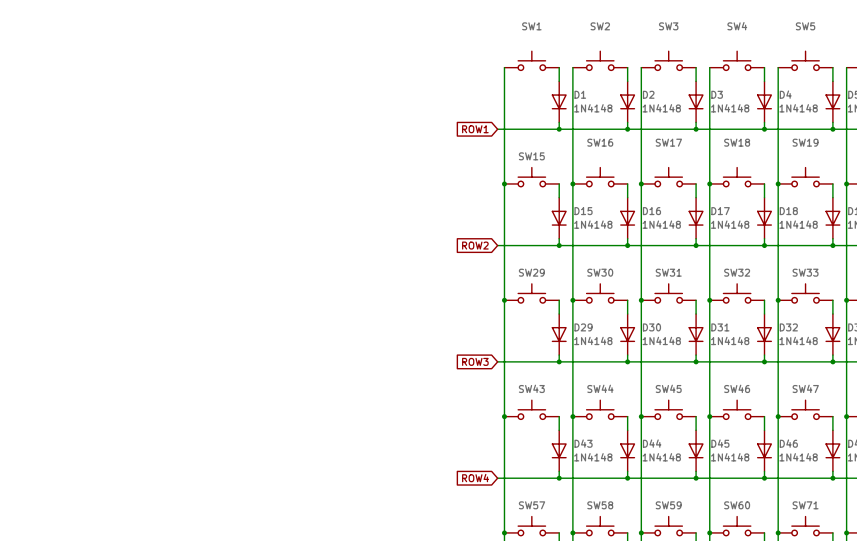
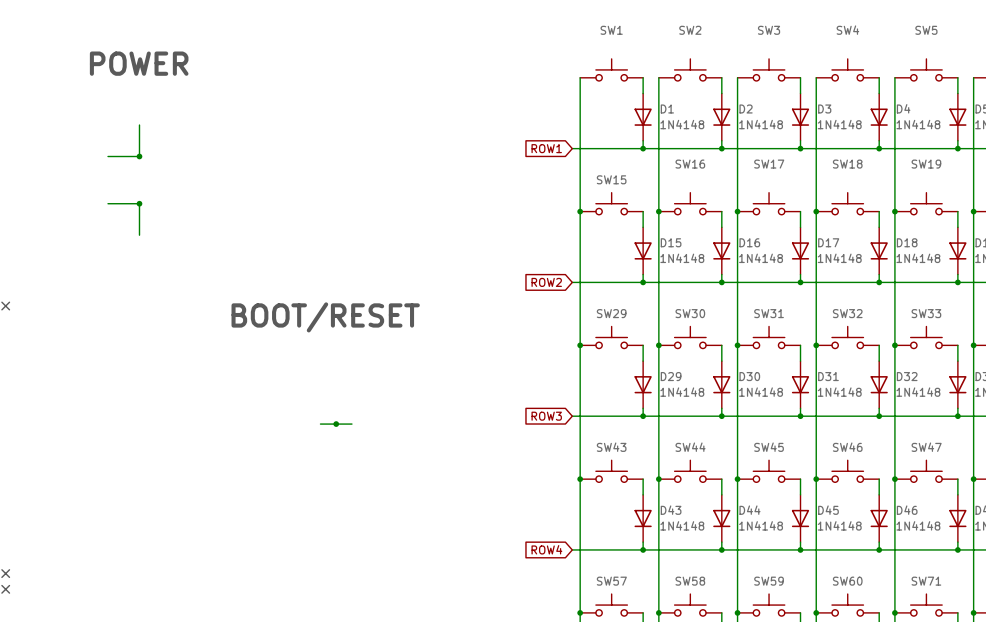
text: none -> POWER (139, 63)
wire: none -> (139, 125) (139, 156) (108, 156)
junction: none -> (139, 156)
wire: none -> (108, 203) (139, 203) (139, 235)
junction: none -> (139, 203)
no-connect mark: none -> (5, 306)
text: none -> BOOT/RESET (325, 317)
wire: none -> (320, 424) (351, 424)
junction: none -> (336, 424)
no-connect mark: none -> (5, 573)
no-connect mark: none -> (5, 589)

